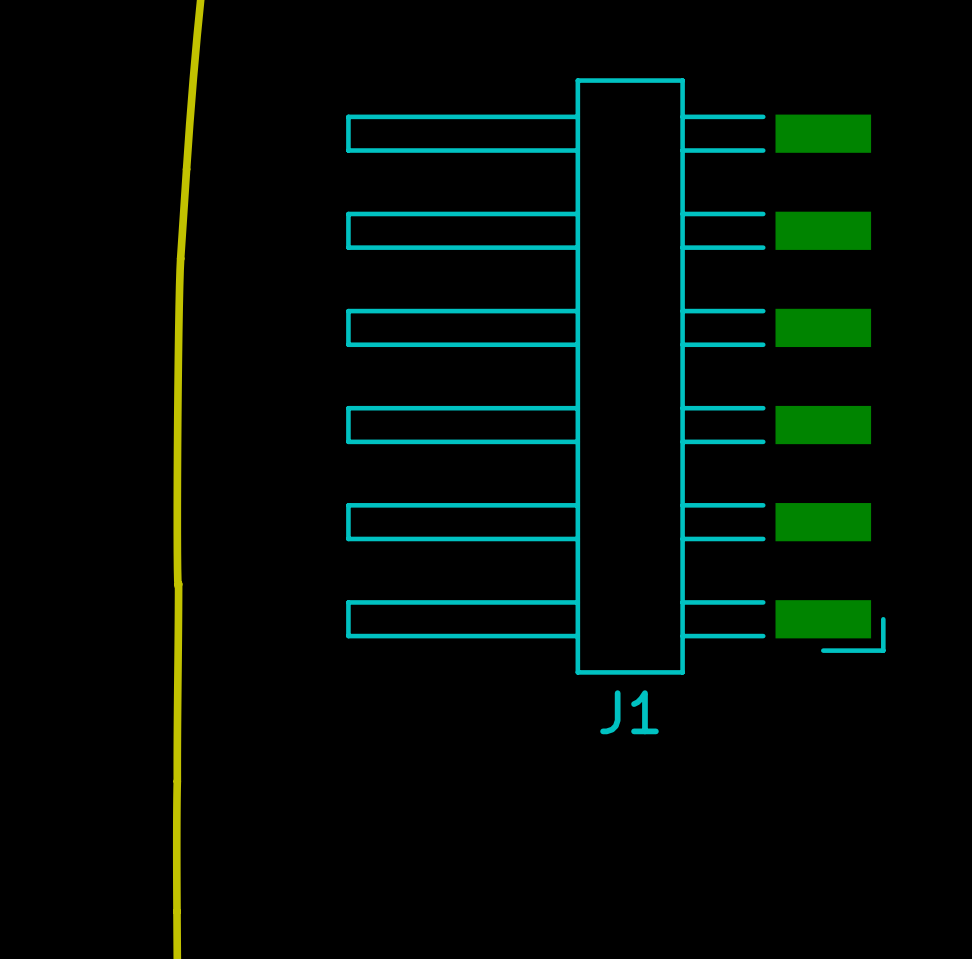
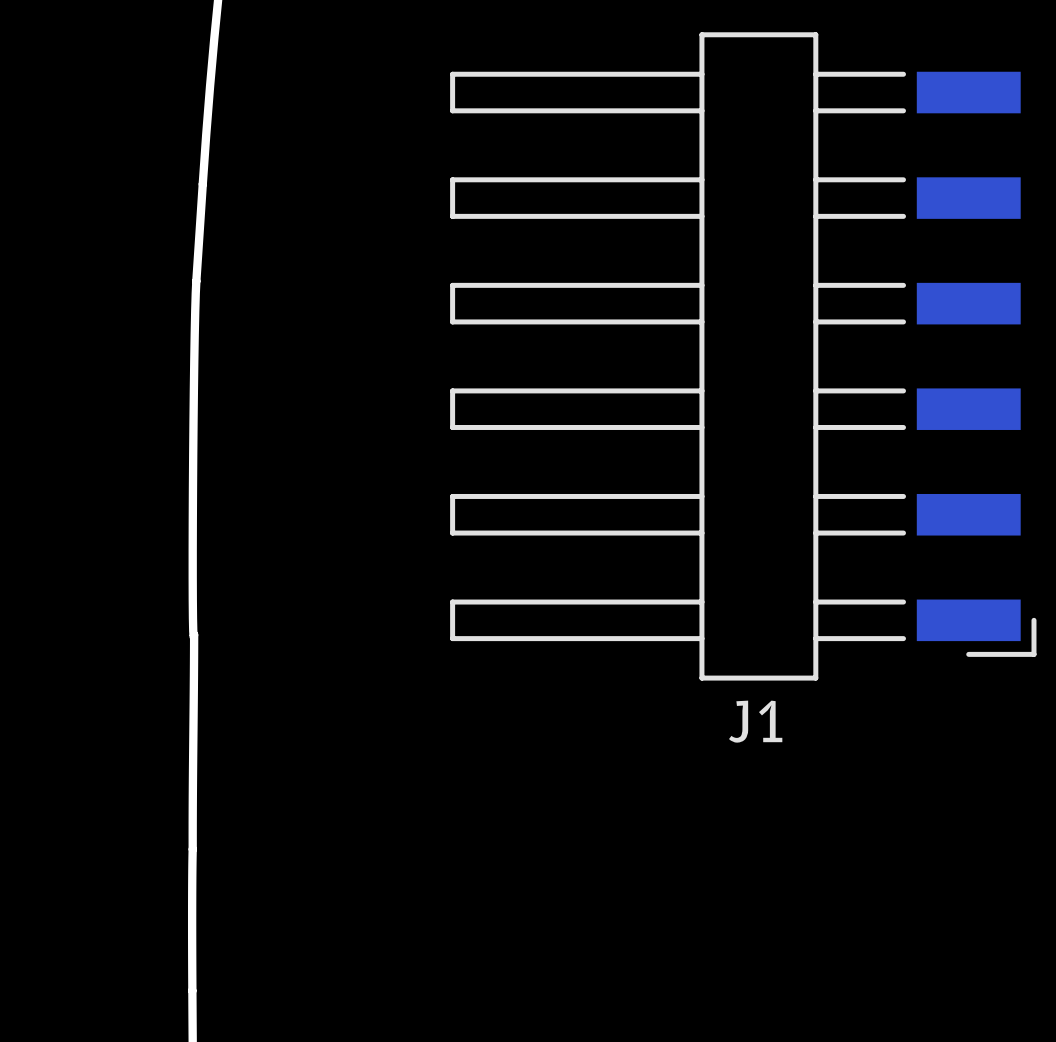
J1 position: (615, 376) -> (743, 356)

